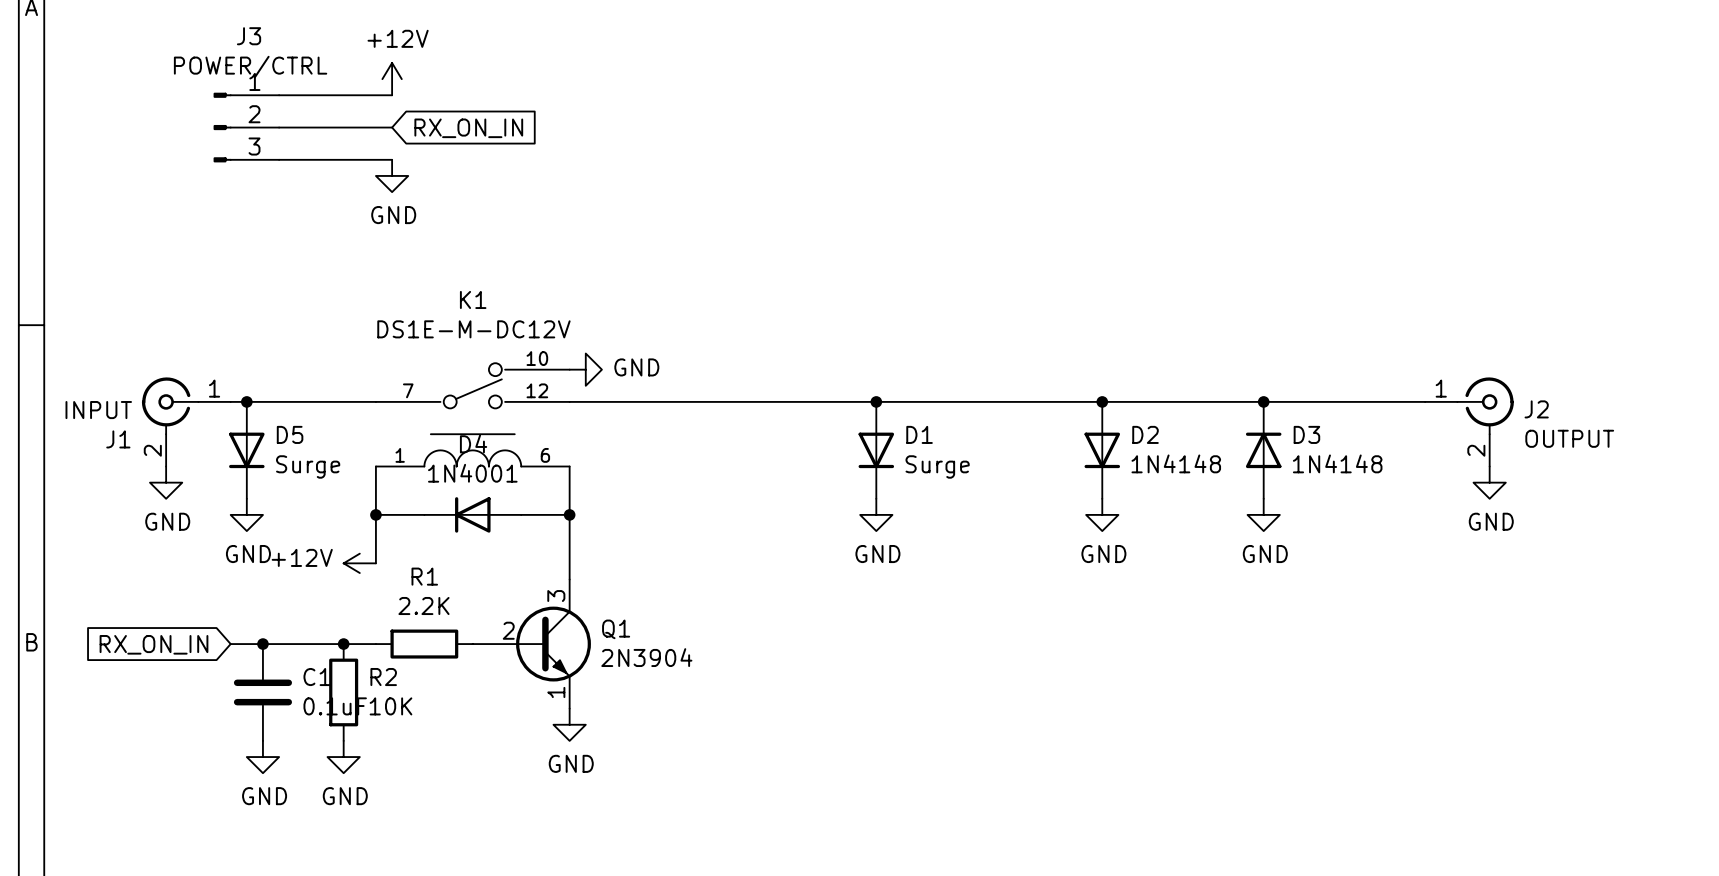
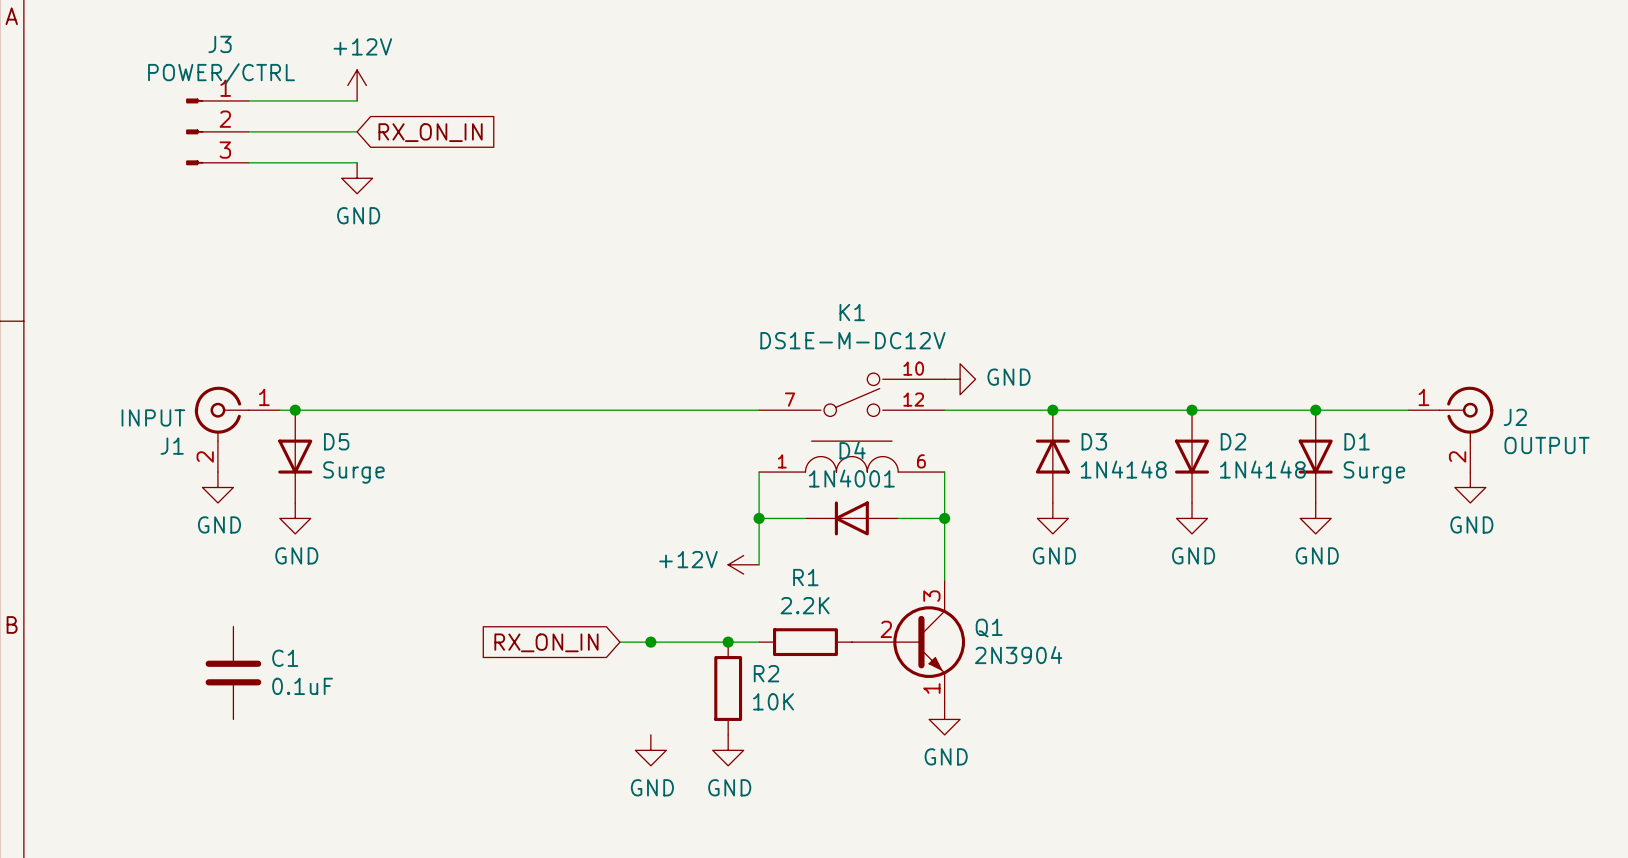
power symbol: GND (585, 369) -> none
power symbol: none -> GND (960, 379)
wire: (230, 401) (375, 401) -> none
junction: (246, 401) -> none
wire: (569, 401) (1425, 401) -> none
junction: (876, 401) -> none
junction position: (1102, 401) -> (1052, 410)
junction position: (1263, 401) -> (1192, 410)
K1 position: (472, 414) -> (851, 422)
wire: none -> (279, 410) (759, 410)
junction: none -> (295, 410)
wire: none -> (944, 410) (1408, 410)
junction: none -> (1315, 410)
J1 position: (186, 421) -> (237, 429)
J2 position: (1469, 421) -> (1450, 429)
D5 position: (246, 450) -> (295, 456)
D1 position: (876, 450) -> (1315, 456)
D2 position: (1102, 450) -> (1192, 456)
D3 position: (1263, 450) -> (1052, 456)
wire: (375, 466) (375, 563) -> none
wire: (569, 466) (569, 579) -> none
power symbol: GND (166, 482) -> none
wire: none -> (759, 472) (759, 564)
wire: none -> (944, 472) (944, 580)
power symbol: GND (1489, 482) -> none
power symbol: none -> GND (1470, 487)
power symbol position: GND (246, 514) -> GND (217, 487)
wire: (375, 514) (424, 514) -> none
junction: (375, 514) -> none
D4 position: (472, 514) -> (851, 518)
wire: (521, 514) (569, 514) -> (759, 518) (805, 518)
junction: (569, 514) -> none
power symbol: GND (876, 514) -> none
power symbol position: GND (1102, 514) -> GND (1052, 518)
power symbol position: GND (1263, 514) -> GND (1192, 518)
power symbol: none -> GND (295, 518)
junction: none -> (759, 518)
wire: none -> (898, 518) (944, 518)
junction: none -> (944, 518)
power symbol: none -> GND (1315, 518)
power symbol: +12V (359, 563) -> none
power symbol: none -> +12V (743, 564)
global label: RX_ON_IN (153, 644) -> none
wire: (230, 644) (375, 644) -> none
junction: (262, 644) -> none
junction: (343, 644) -> none
R1 position: (424, 644) -> (805, 642)
Q1 position: (531, 644) -> (908, 642)
global label: none -> RX_ON_IN (546, 642)
wire: none -> (619, 642) (759, 642)
junction: none -> (650, 642)
junction: none -> (728, 642)
R2 position: (343, 692) -> (728, 688)
power symbol: GND (569, 724) -> none
power symbol: none -> GND (944, 719)
power symbol: GND (262, 757) -> none
power symbol: GND (343, 757) -> none
power symbol: none -> GND (650, 750)
power symbol: none -> GND (728, 750)

